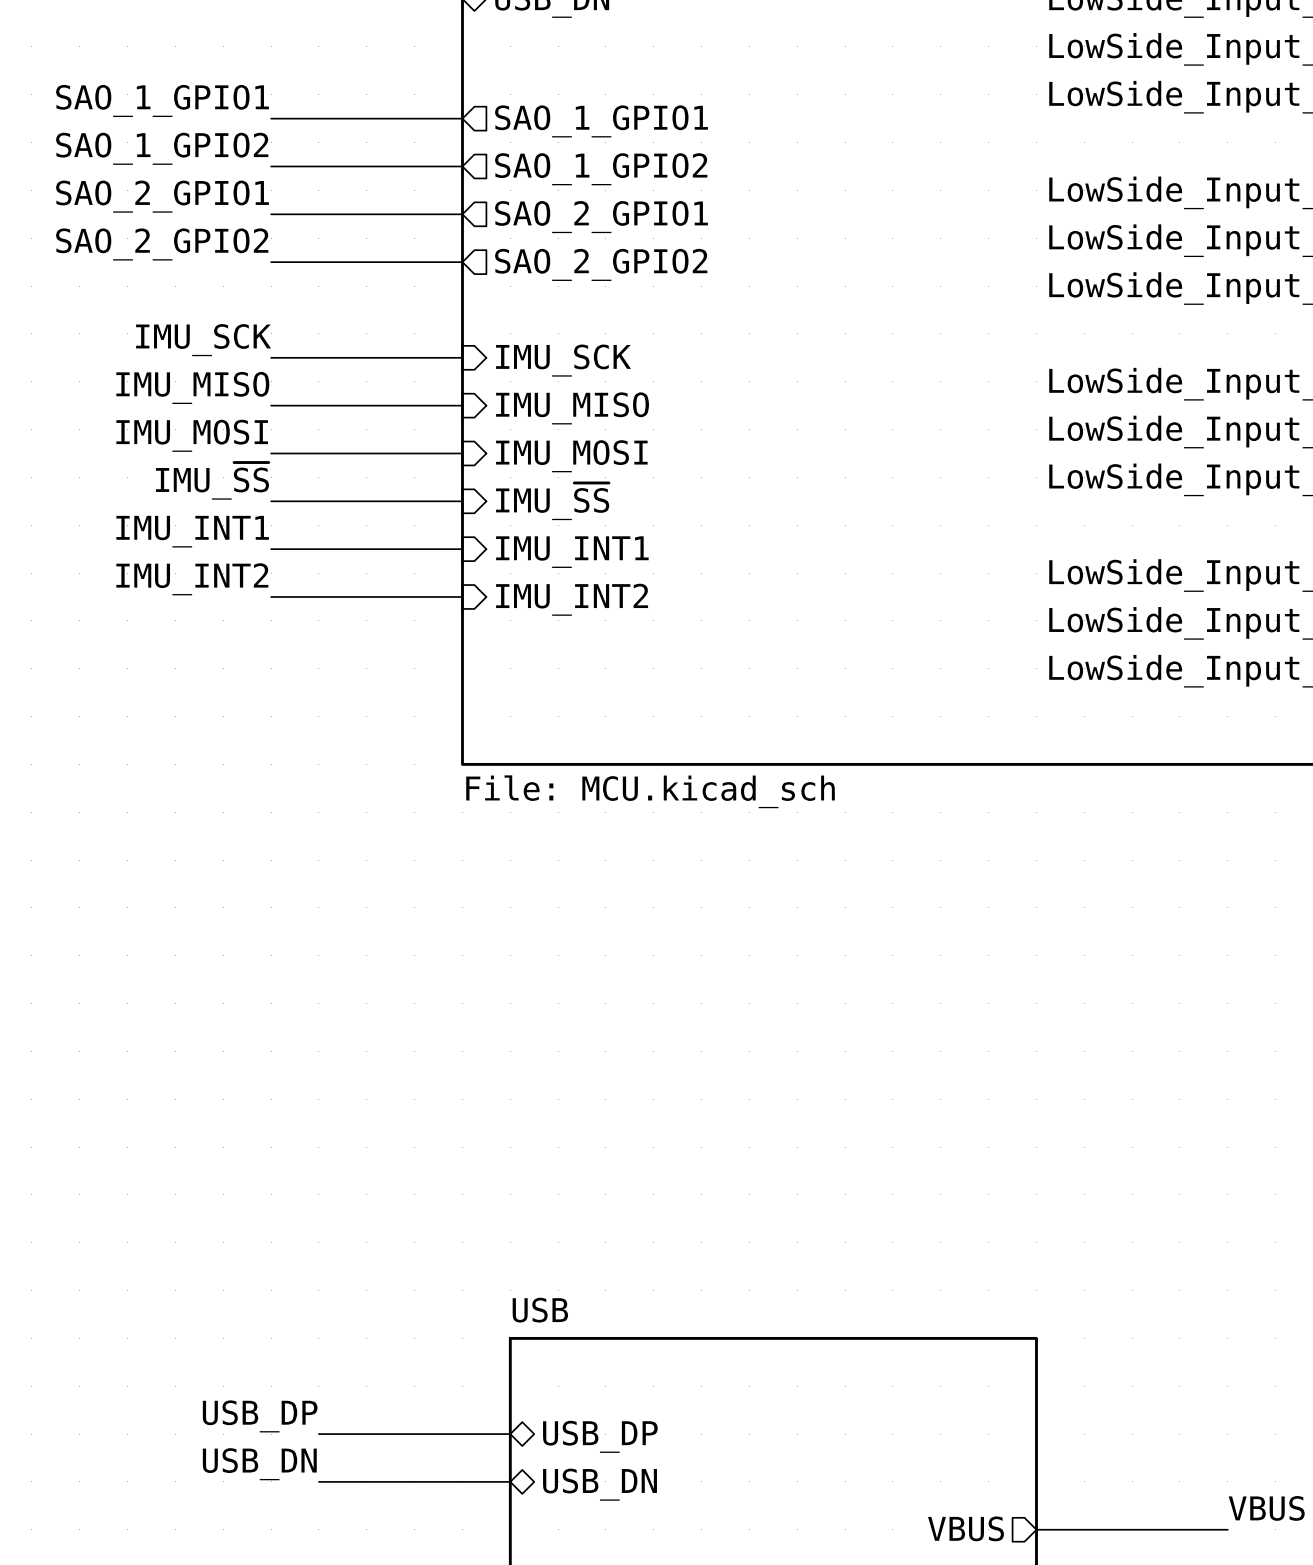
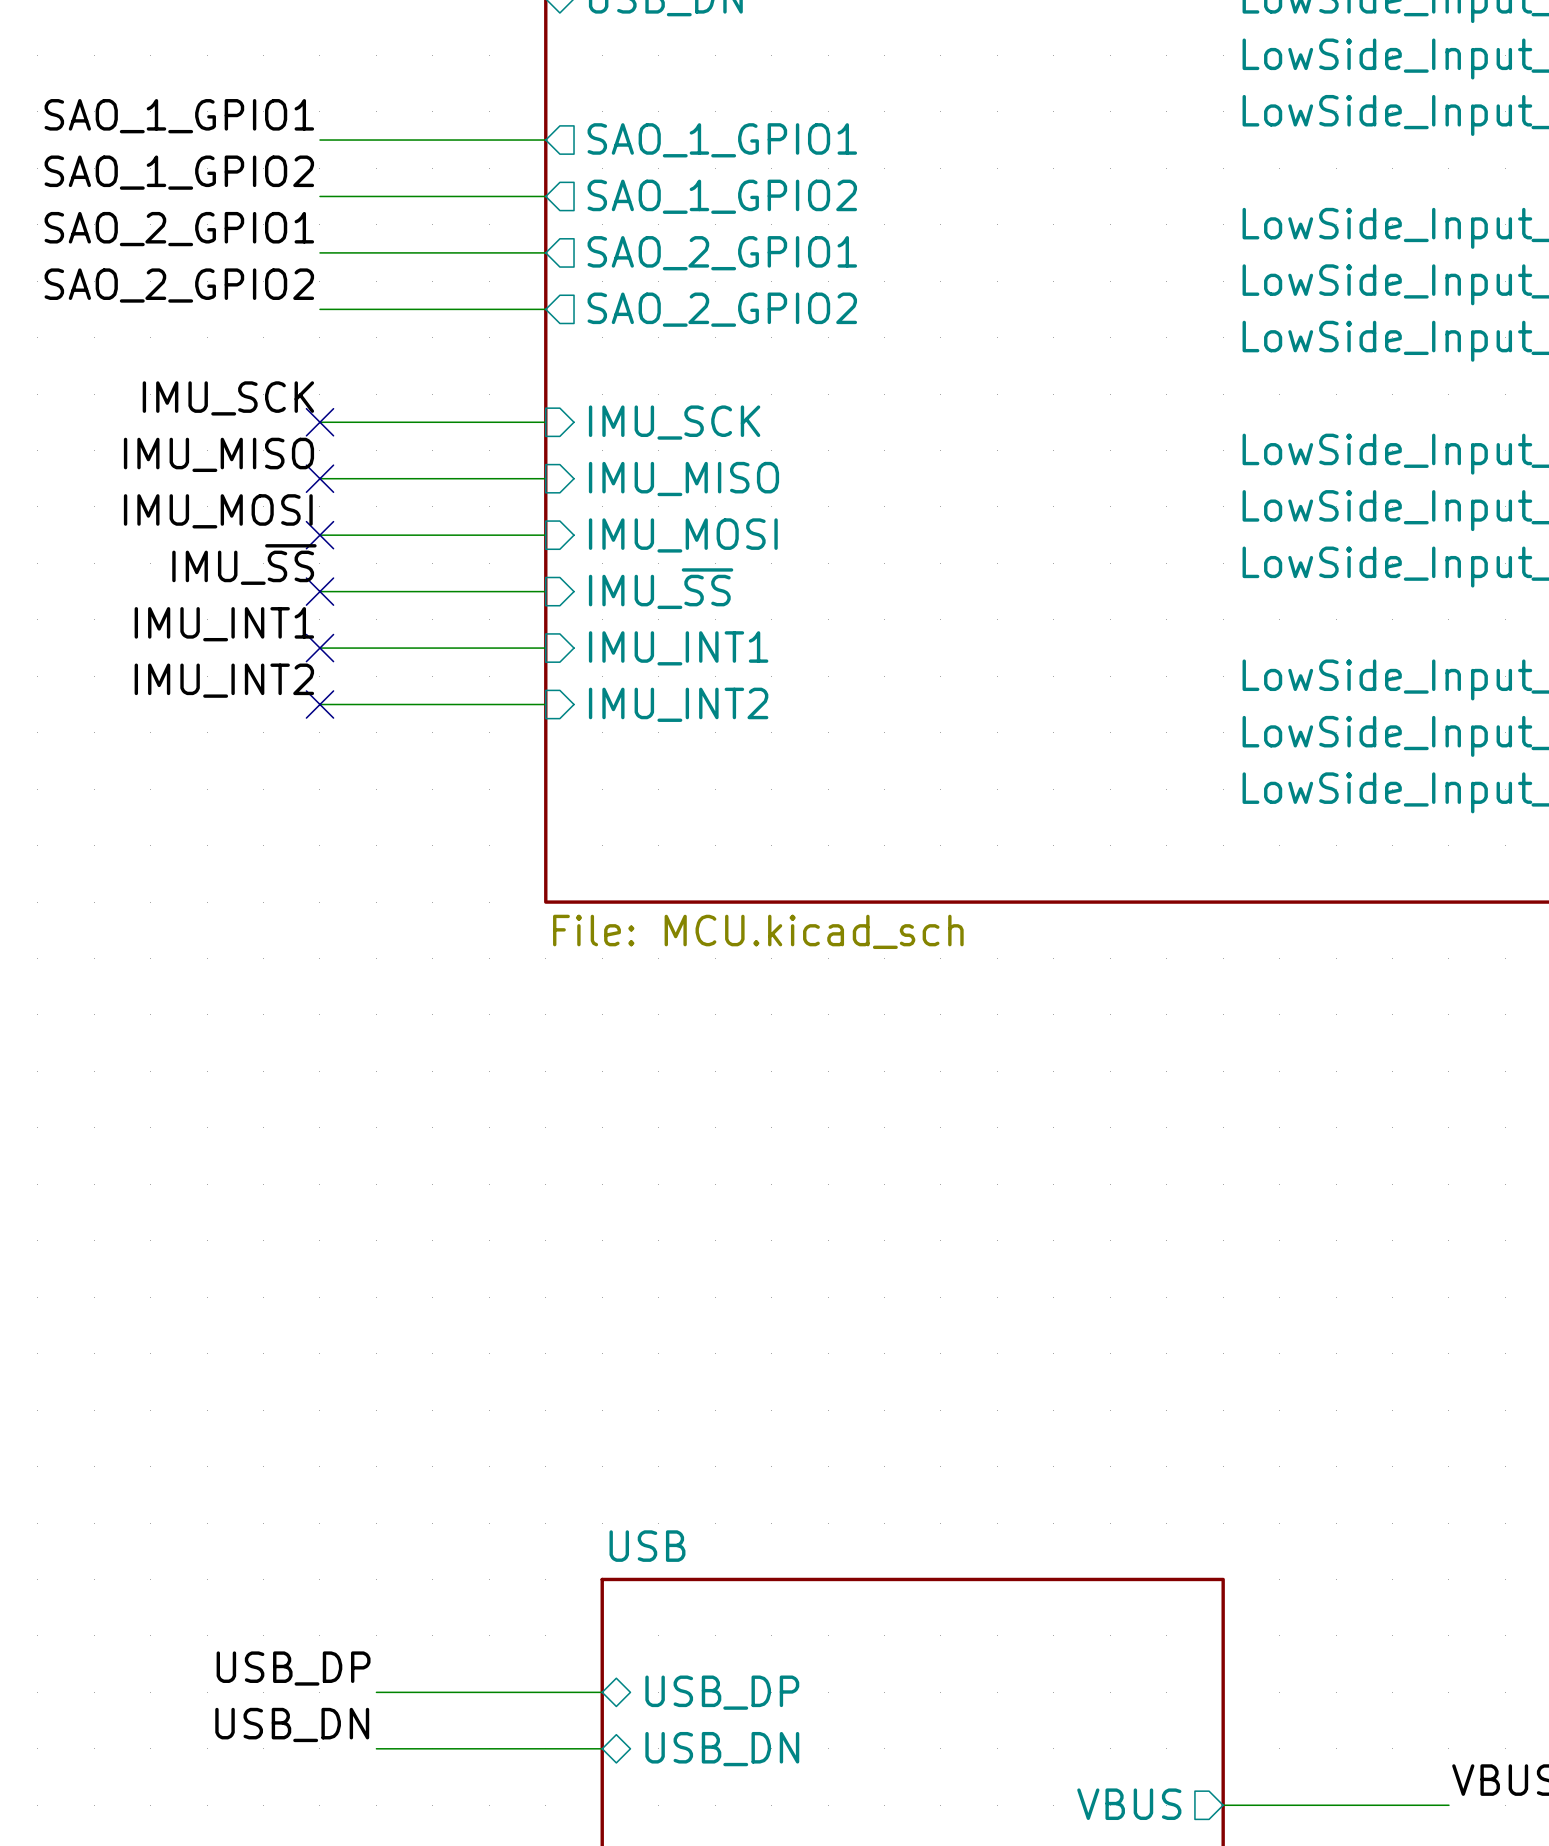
no-connect mark: none -> (319, 422)
no-connect mark: none -> (319, 478)
no-connect mark: none -> (319, 535)
no-connect mark: none -> (319, 591)
no-connect mark: none -> (319, 648)
no-connect mark: none -> (319, 704)

